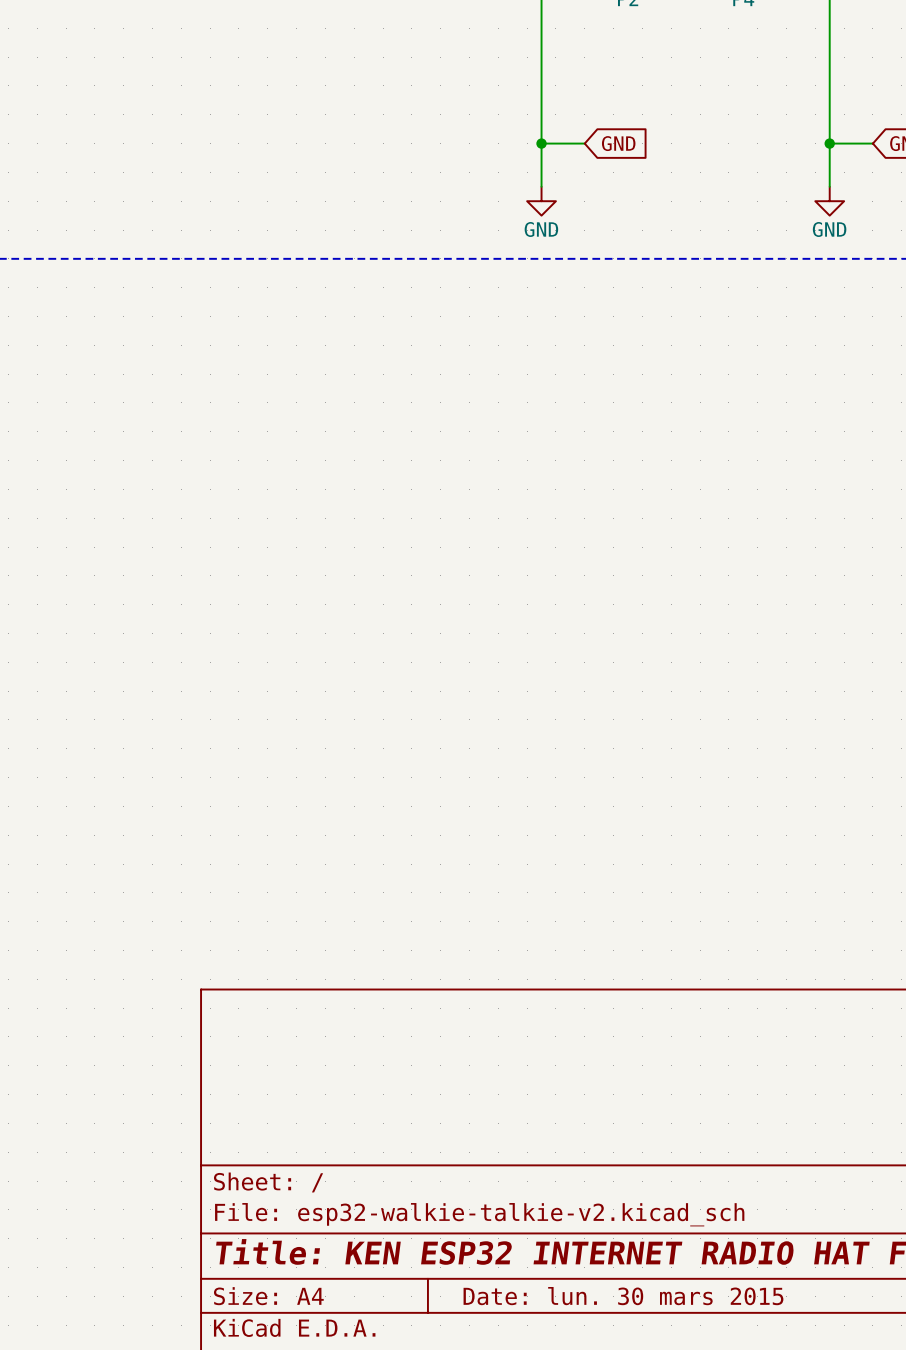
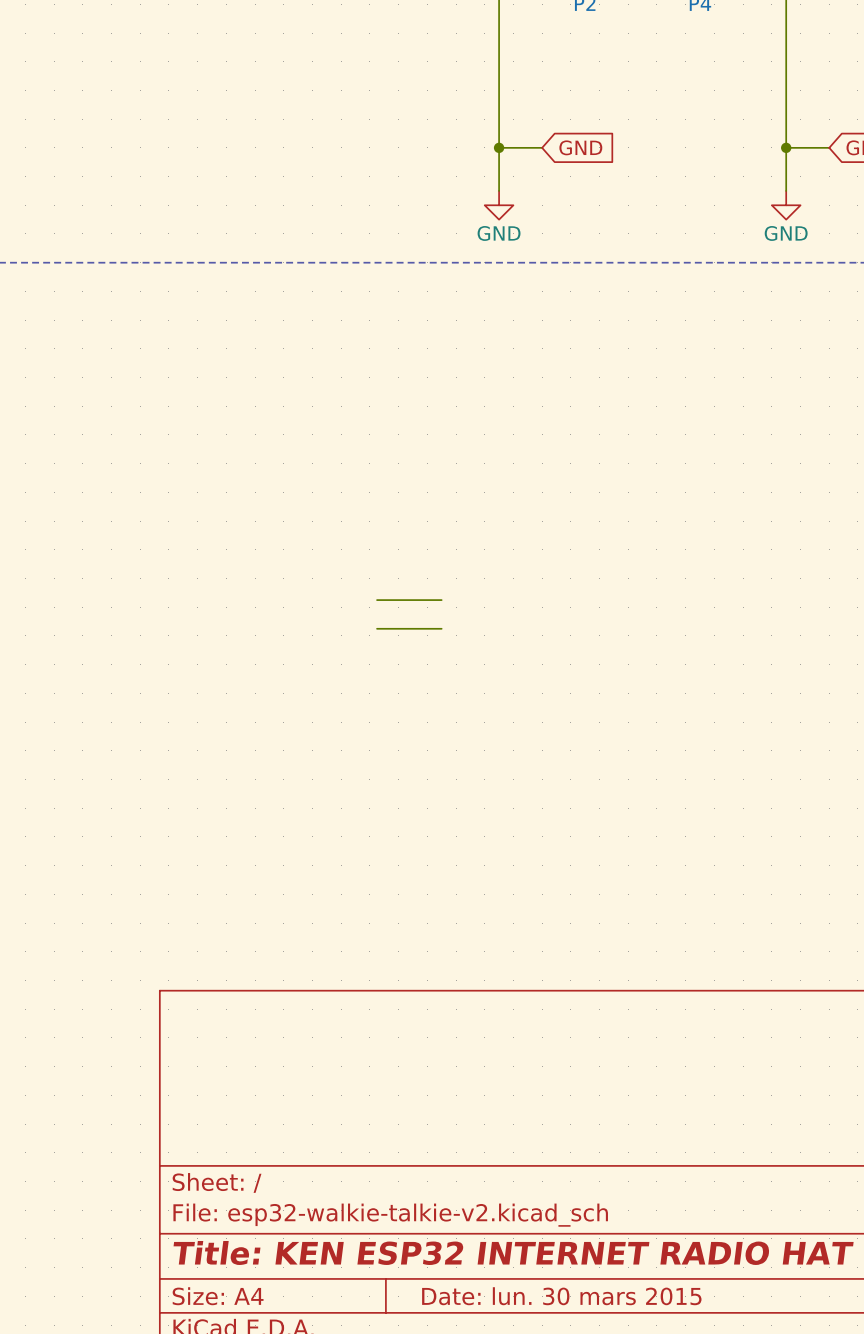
wire: none -> (377, 600) (441, 600)
wire: none -> (377, 628) (441, 628)

